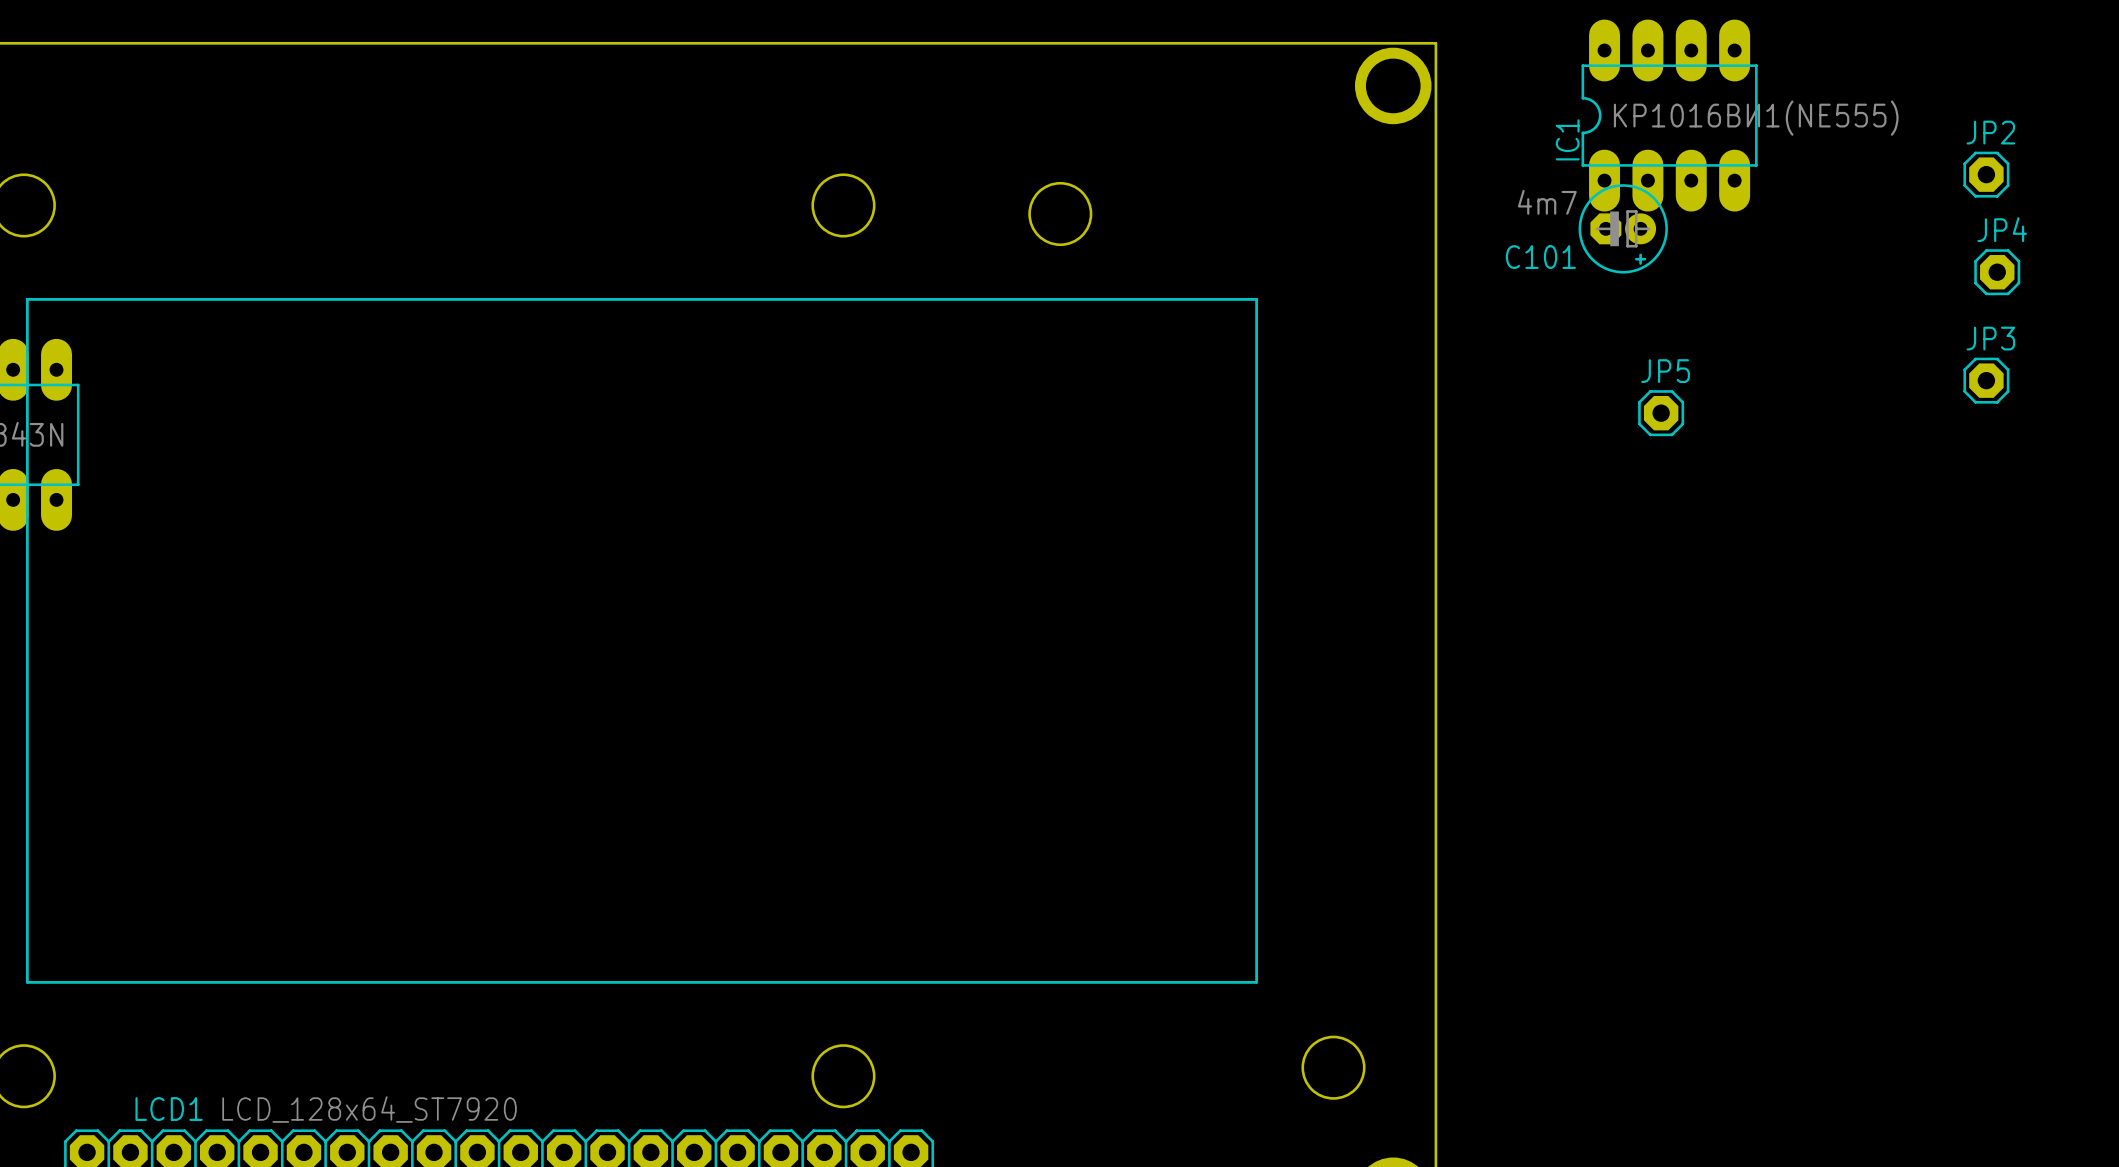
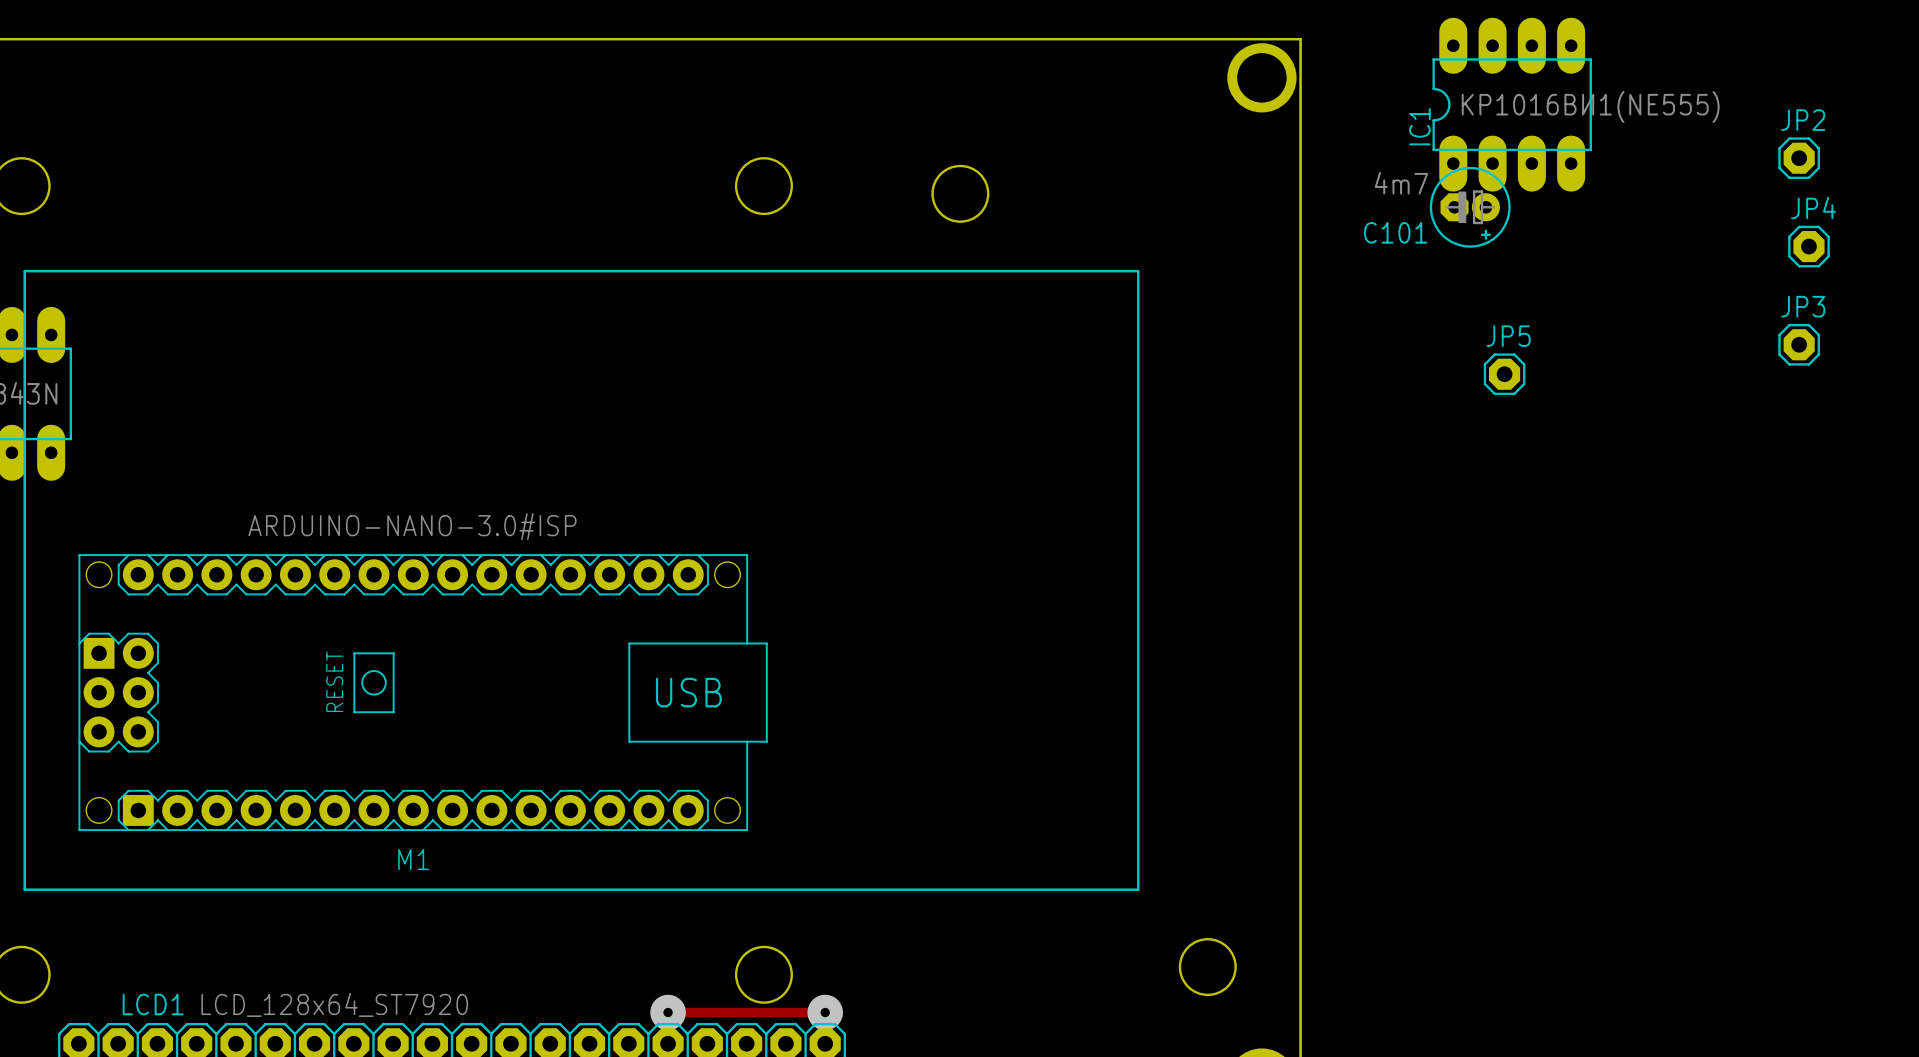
M1: none -> ARDUINO-NANO-3.0#ISP (423, 692)
track: none -> (668, 1012) (825, 1012)
via: none -> (668, 1012)
via: none -> (825, 1012)

